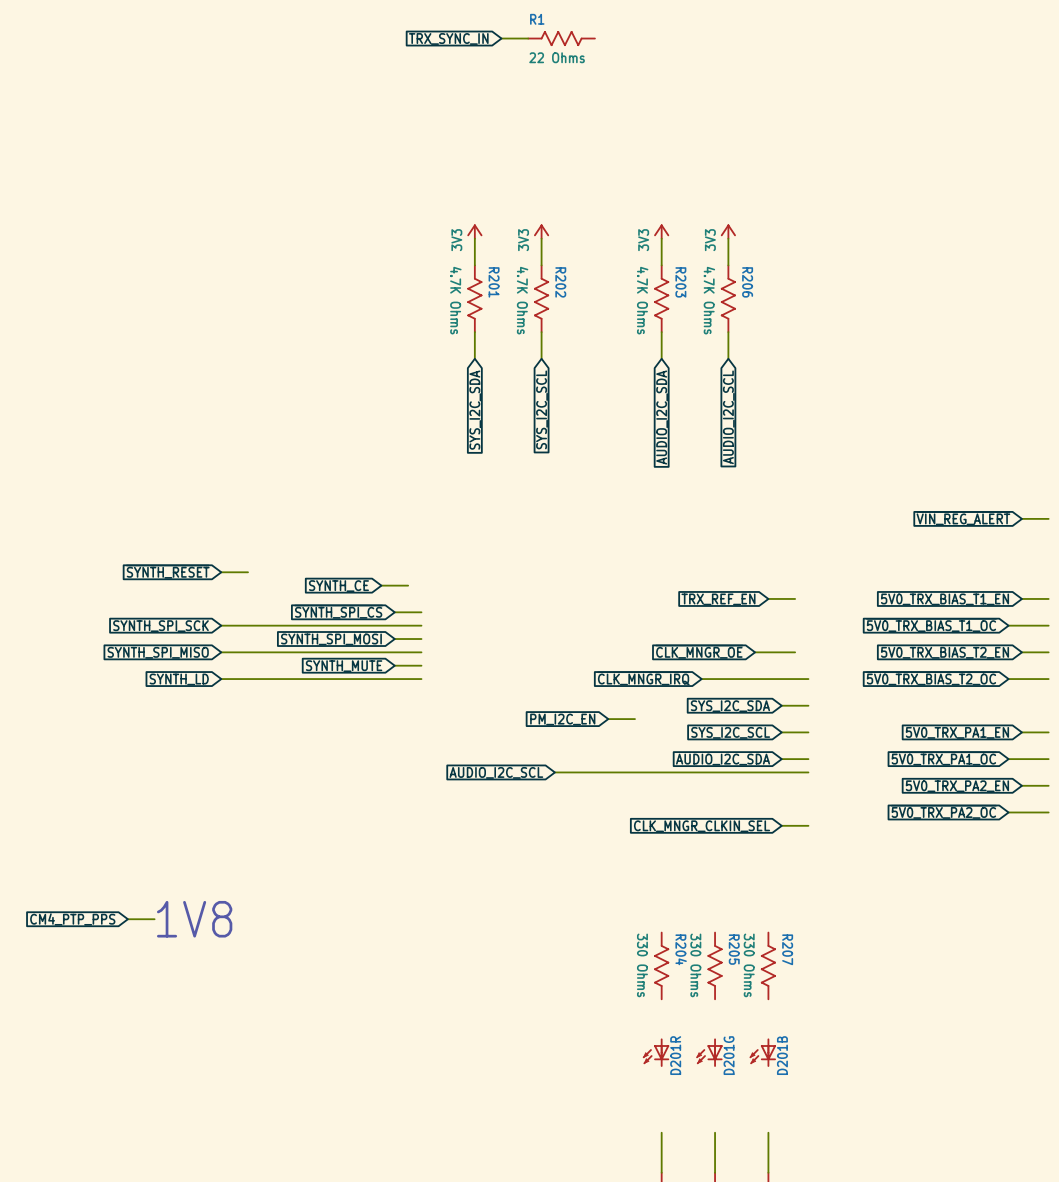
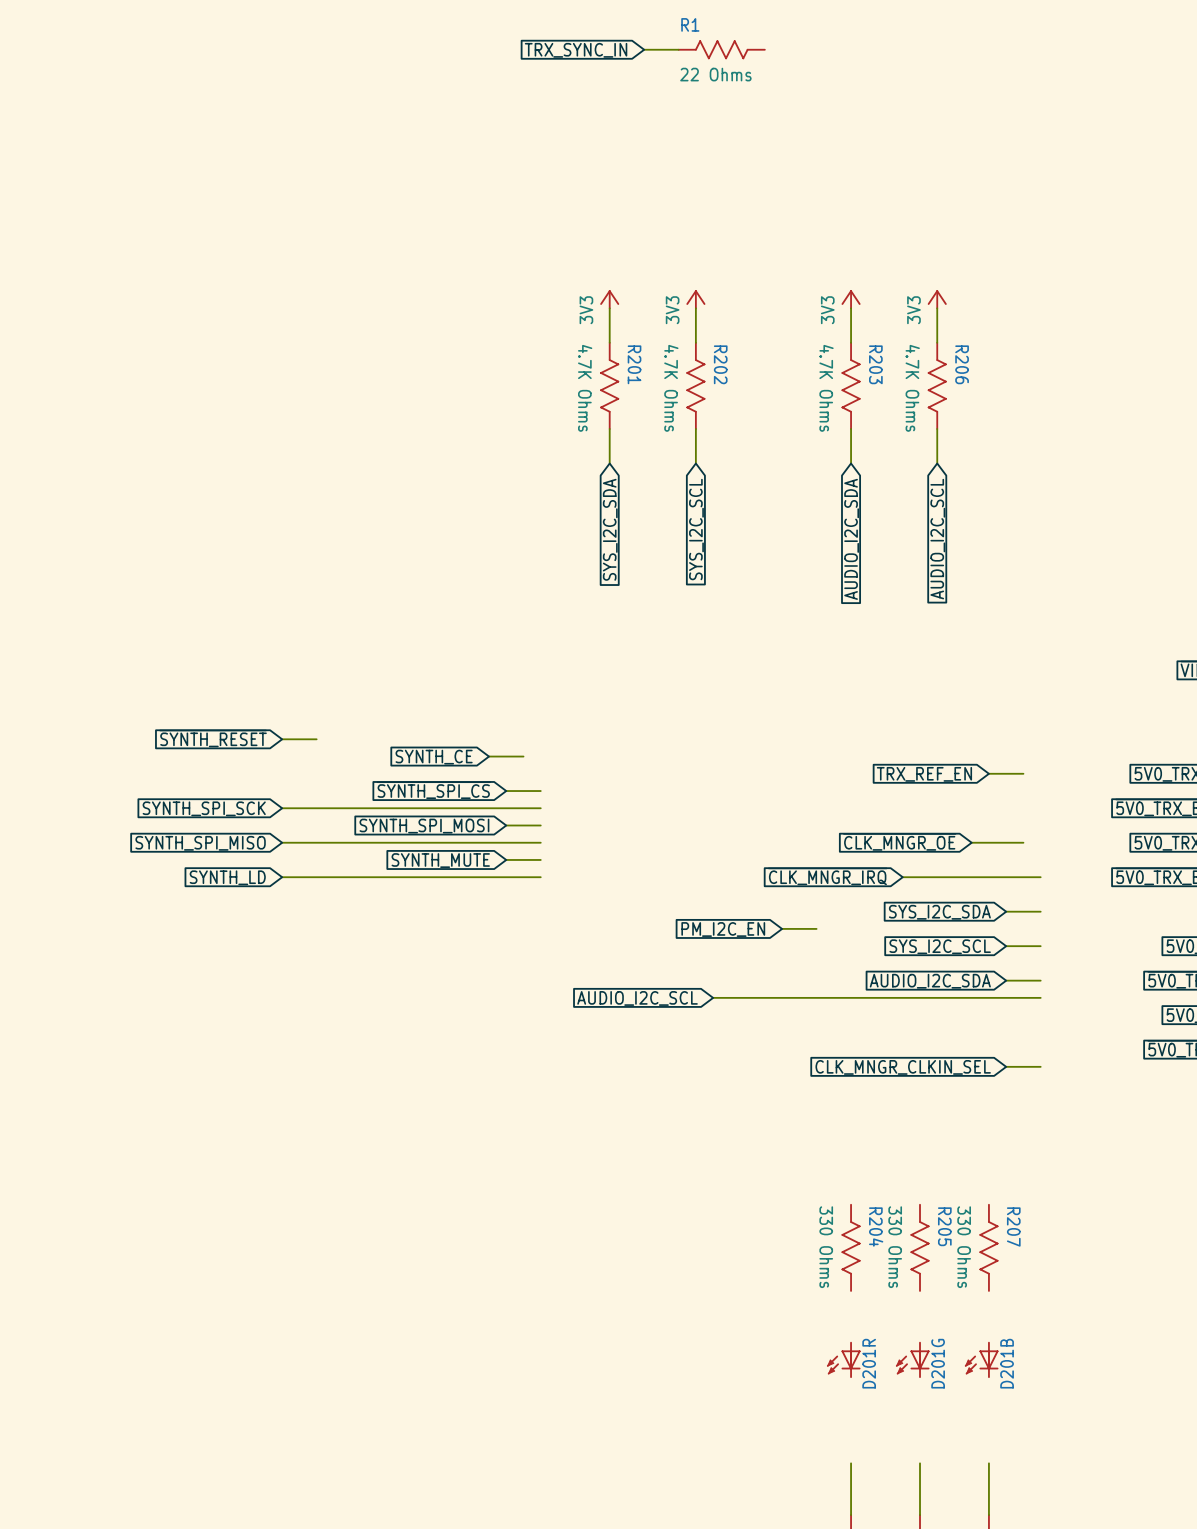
global label: CM4_PTP_PPS (72, 919) -> none
wire: (127, 919) (154, 919) -> none
text: 1V8 (194, 919) -> none

